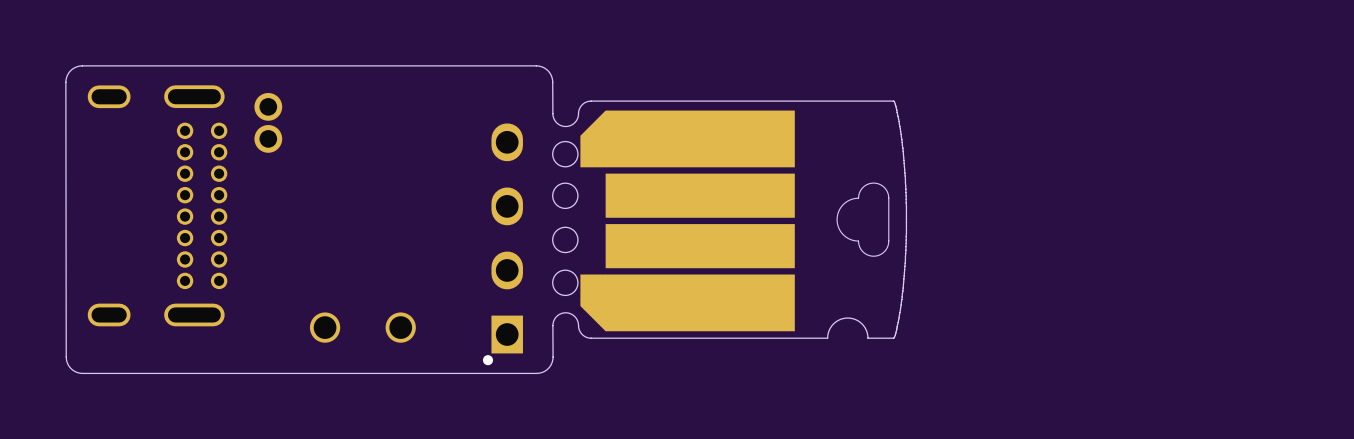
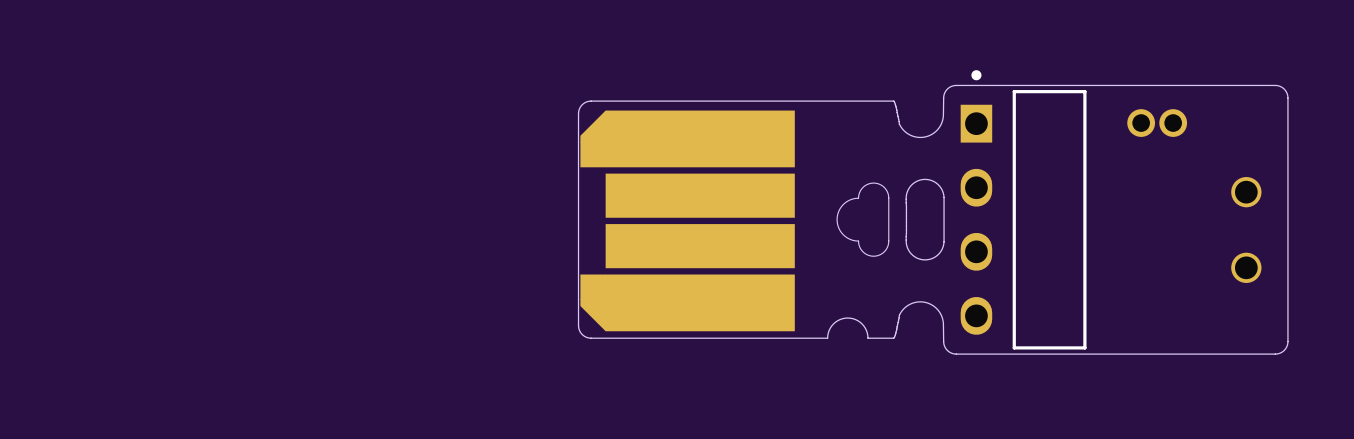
board edge: (578, 113) (575, 121) (570, 125) (564, 126) (556, 122) (553, 115) (551, 76) (546, 69) (536, 65) (82, 65) (70, 70) (65, 82) (66, 357) (69, 367) (76, 372) (538, 373) (546, 370) (552, 361) (553, 323) (555, 317) (562, 313) (569, 313) (575, 317) (578, 325) -> (578, 113) (578, 325)
part: (268, 122) -> none
part: none -> (1157, 123)
board edge: (899, 124) (906, 199) -> (906, 240) (911, 253) (924, 259) (937, 254) (944, 241) (944, 197) (939, 186) (929, 179) (917, 181) (908, 189) (906, 199)
round board edge: [552, 140, 579, 168] -> none
round board edge: [552, 182, 579, 210] -> none
part: (157, 205) -> none
part: none -> (1023, 209)
round board edge: [552, 226, 579, 254] -> none
part: none -> (1246, 229)
board edge: (906, 240) (899, 315) -> (899, 124) (906, 132) (914, 136) (922, 137) (933, 133) (939, 127) (942, 119) (944, 93) (948, 88) (954, 85) (1275, 85) (1281, 87) (1286, 91) (1287, 98) (1287, 343) (1284, 350) (1275, 354) (954, 353) (948, 351) (944, 346) (942, 319) (939, 311) (933, 305) (922, 301) (914, 302) (906, 306) (899, 315)
part: (502, 244) -> none
round board edge: [552, 269, 579, 297] -> none
part: (362, 327) -> none

